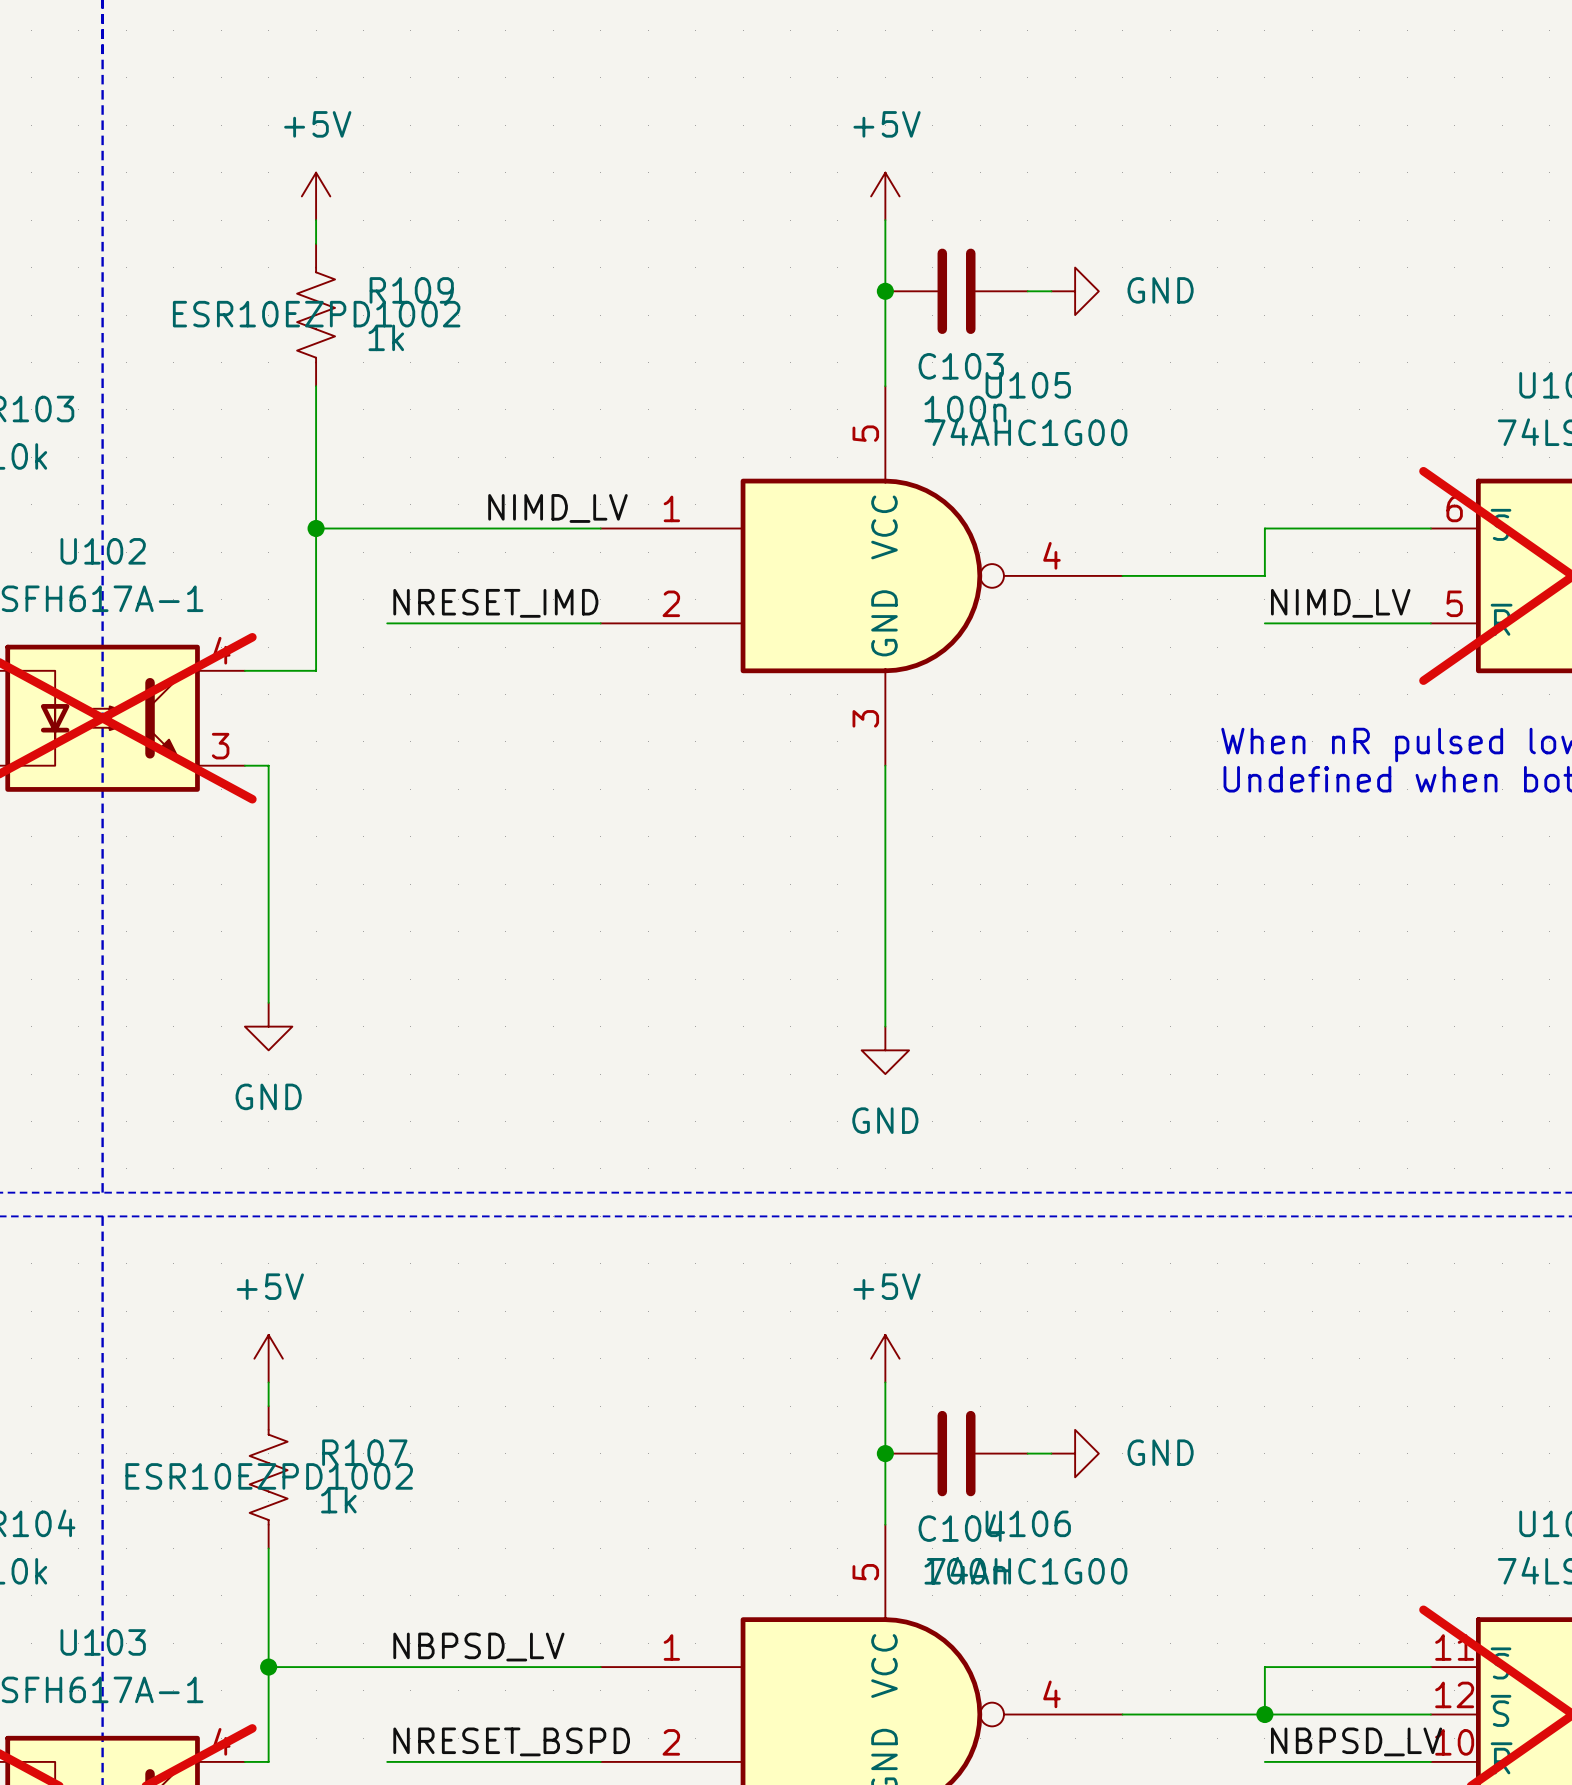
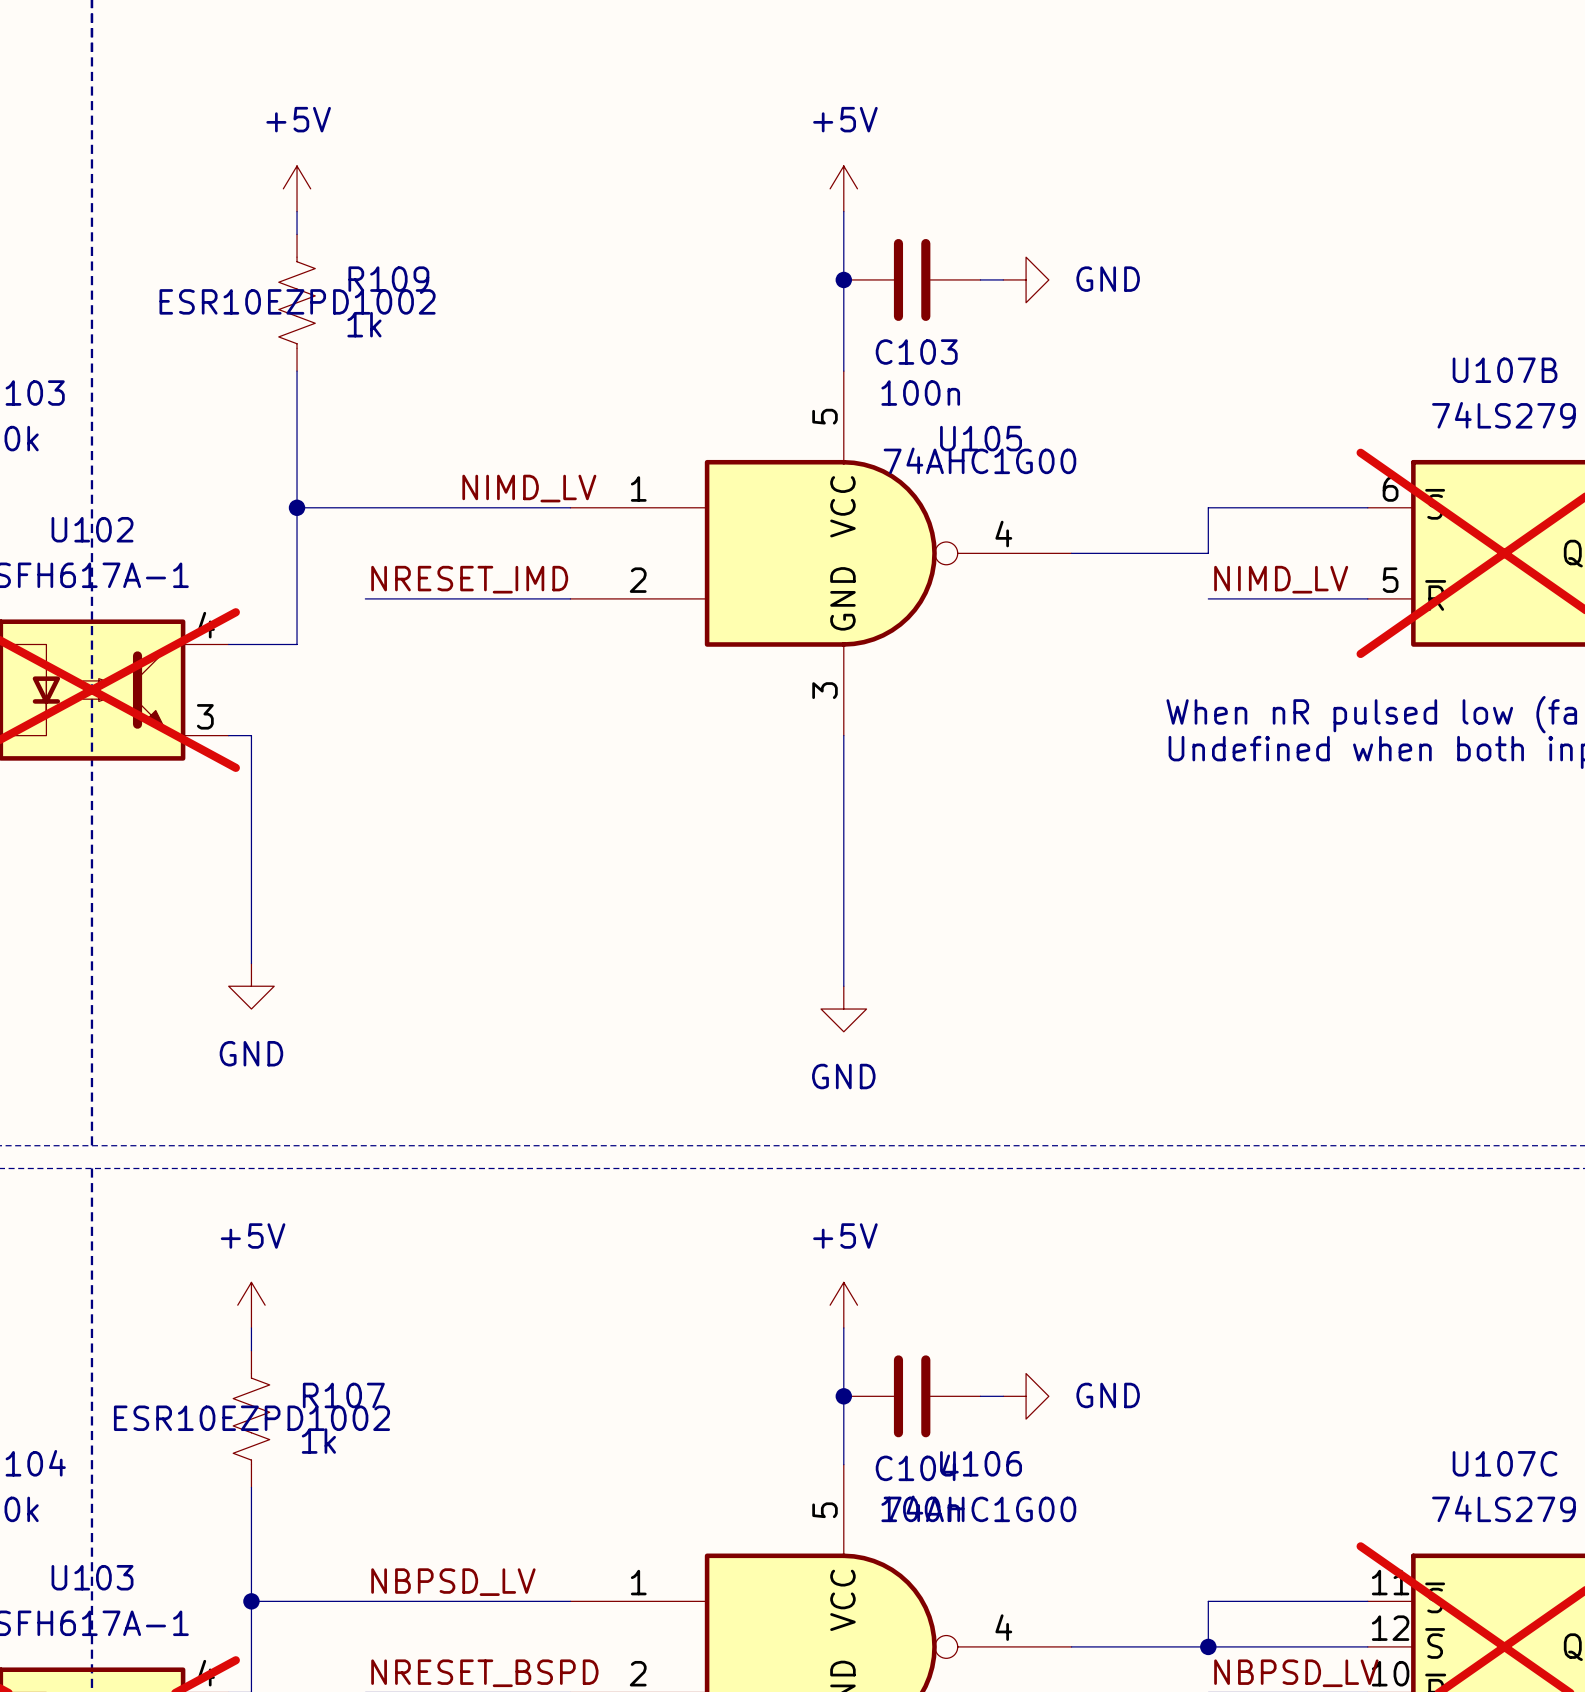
U105 name position: U105 (1028, 385) -> U105 (981, 438)
U105 value position: 74AHC1G00 (1027, 432) -> 74AHC1G00 (979, 460)

